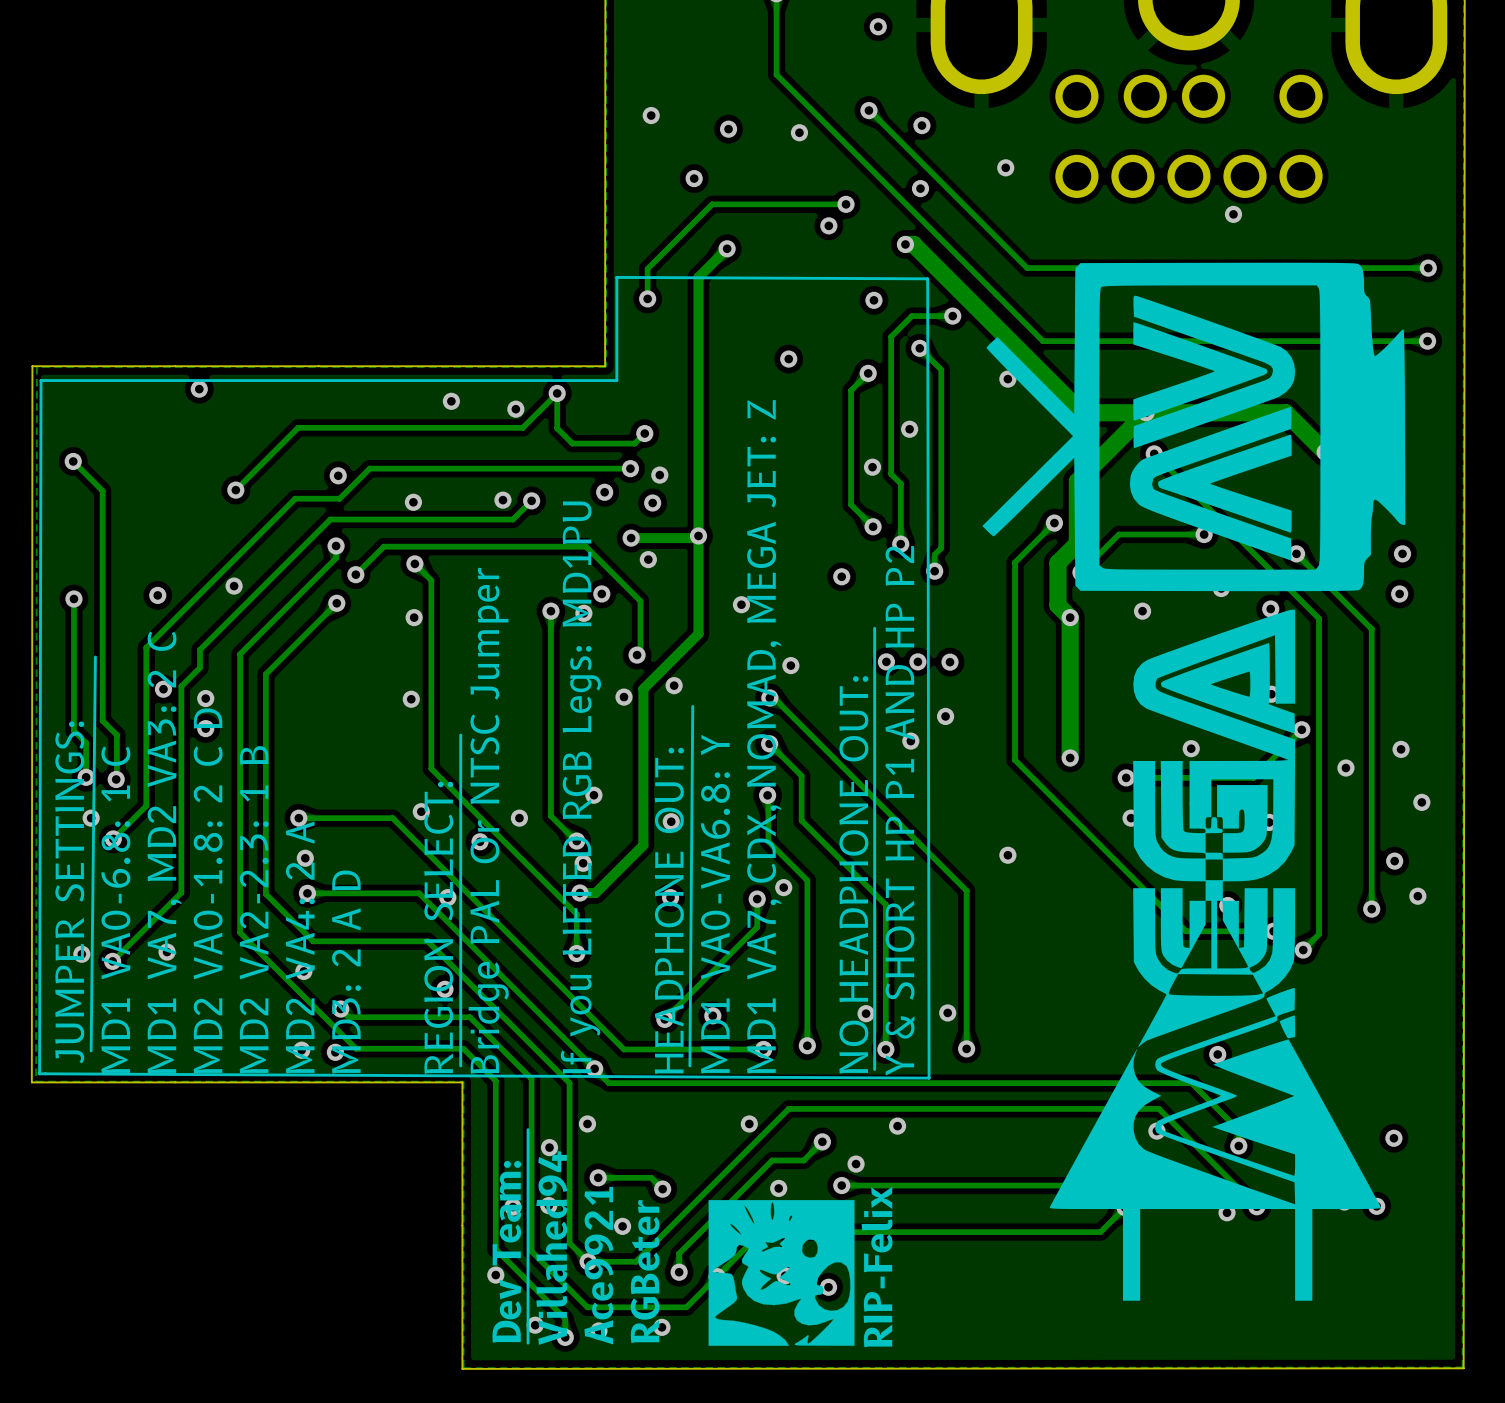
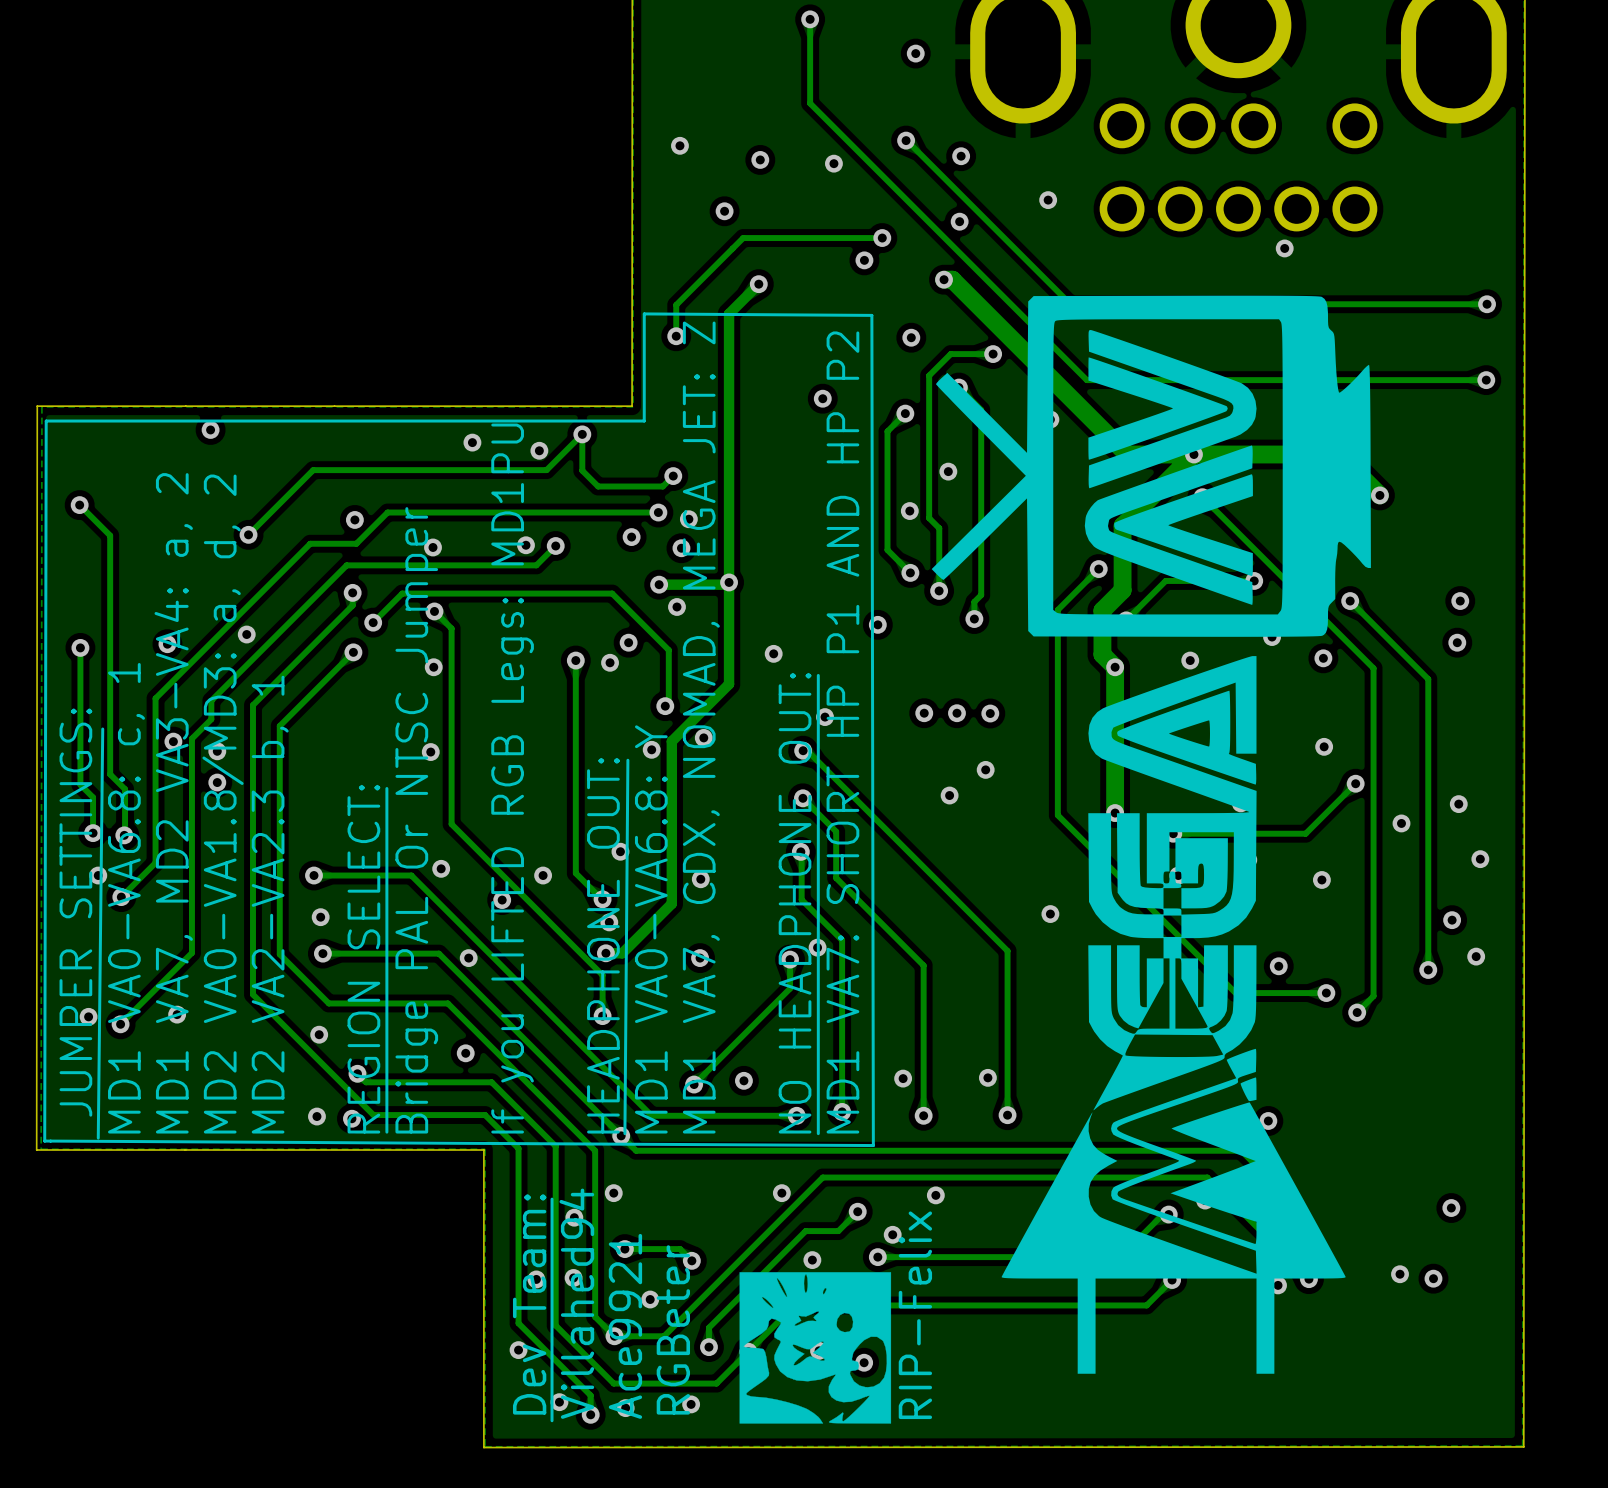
line: (616, 277) (927, 278) (929, 1078) (45, 1073) -> (644, 313) (871, 315) (873, 1145) (50, 1141)
line: (874, 628) (874, 1069) -> (818, 675) (818, 1133)
line: (692, 706) (689, 1065) -> (627, 760) (624, 1133)
line: (460, 735) (460, 1065) -> (386, 788) (386, 1132)
text position: MD1 VA7, CDX, NOMAD, MEGA JET: Z (764, 736) -> MD1 VA7, CDX, NOMAD, MEGA JET: Z (701, 727)
text: none -> MD1 VA7: SHORT HP P1 AND HP P2 (842, 732)
drawing position: (1193, 781) -> (1151, 834)
text position: If you LIFTED RGB Legs: MD1PU (580, 787) -> If you LIFTED RGB Legs: MD1PU (512, 778)
text: Y & SHORT HP P1 AND HP P2 (900, 810) -> none
text position: Bridge PAL Or NTSC Jumper (488, 820) -> Bridge PAL Or NTSC Jumper (416, 820)
text: MD1 VA7, MD2 VA3: 2 C (164, 852) -> MD1 VA7, MD2 VA3-VA4: a, 2 (173, 803)
text position: NO HEADPHONE OUT: (853, 874) -> NO HEADPHONE OUT: (795, 903)
text: MD2 VA0-1.8: 2 C D (208, 890) -> MD2 VA0-VA1.8/MD3: a, d, 2 (223, 804)
text position: MD1 VA0-VA6.8: Y (715, 904) -> MD1 VA0-VA6.8: Y (651, 929)
text: MD1 VA0-6.8: 1 C (115, 909) -> MD1 VA0-VA6.8: c, 1 (126, 898)
text: MD2 VA2-2.3: 1 B (254, 909) -> MD2 VA2-VA2.3 b, 1 (270, 904)
text position: HEADPHONE OUT: (669, 910) -> HEADPHONE OUT: (603, 945)
text position: REGION SELECT: (438, 927) -> REGION SELECT: (363, 959)
text: MD2 VA4: 2 A (300, 947) -> none
text: MD3: 2 A D (346, 971) -> none

